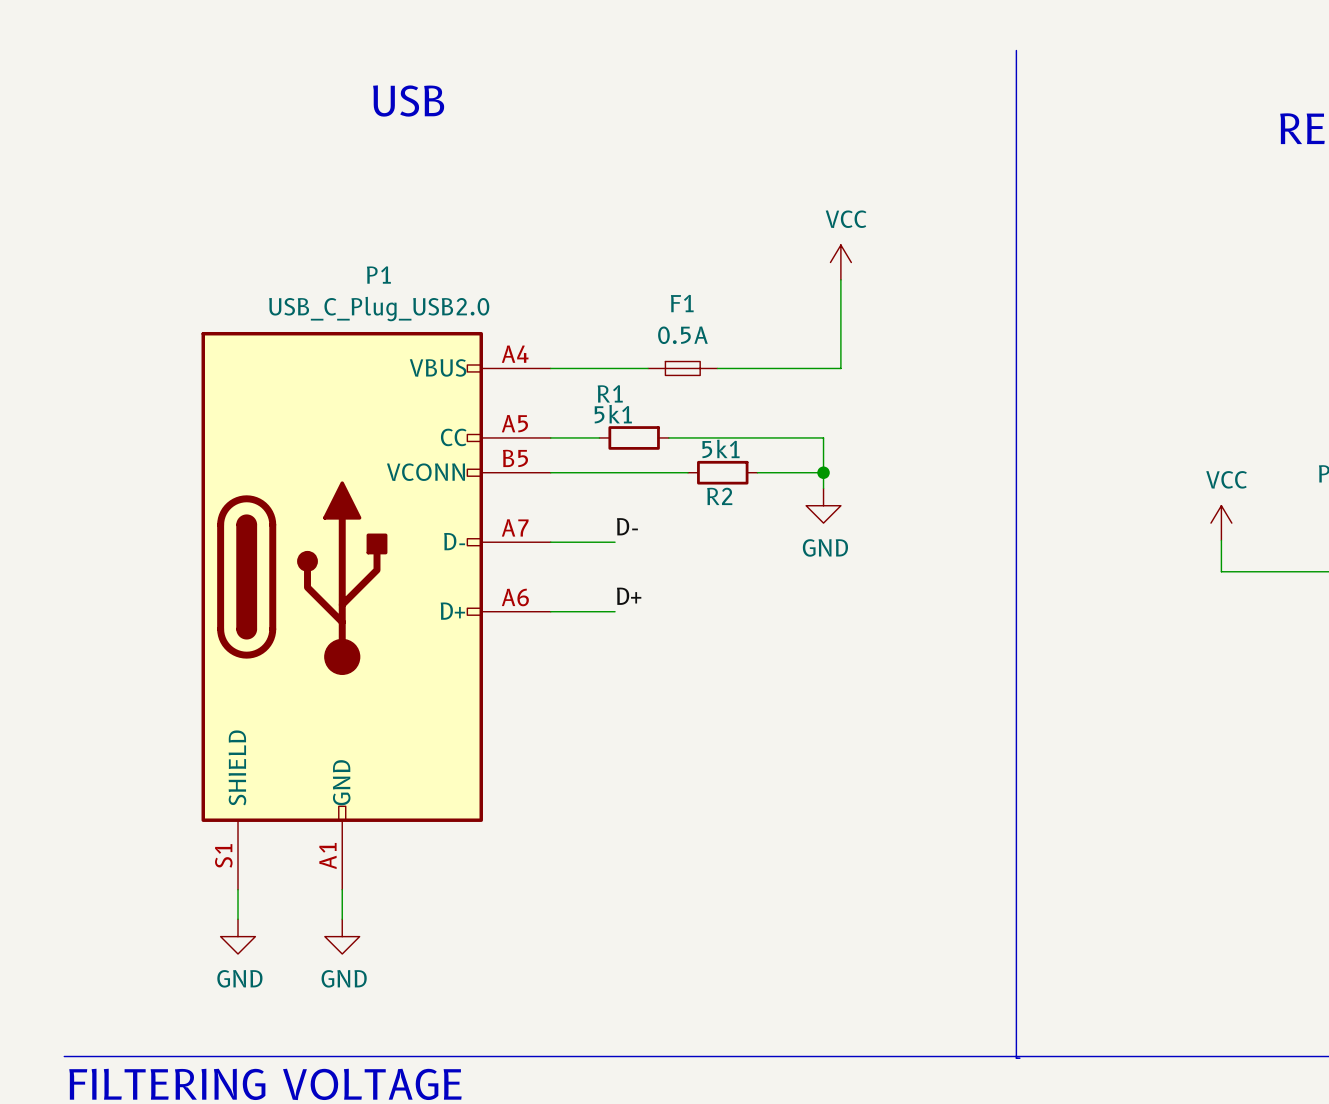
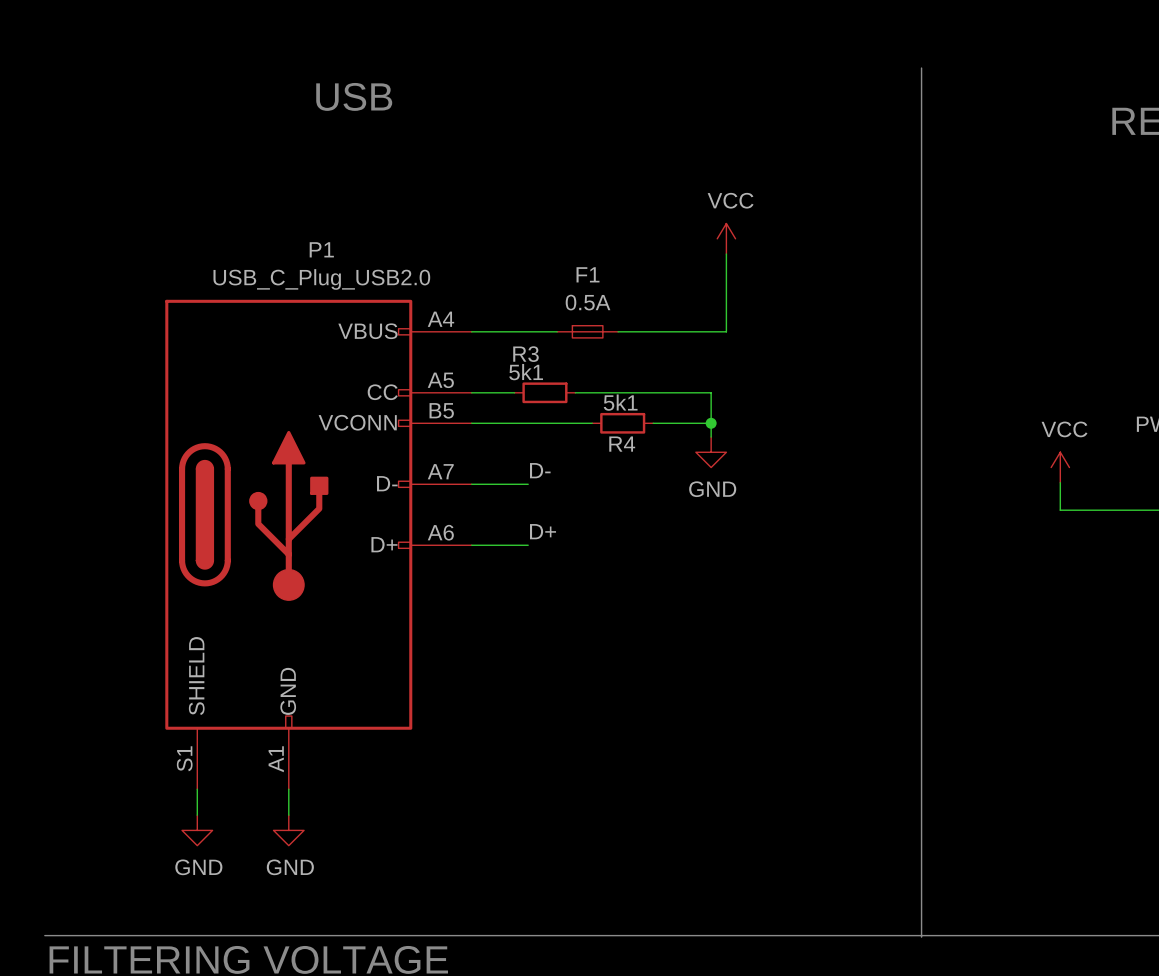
line: (1016, 50) (1016, 1058) (1019, 1058) -> none
line: none -> (921, 68) (921, 937)
R1 name: R1 (610, 393) -> R3 (525, 354)
R2 name: R2 (719, 496) -> R4 (622, 444)

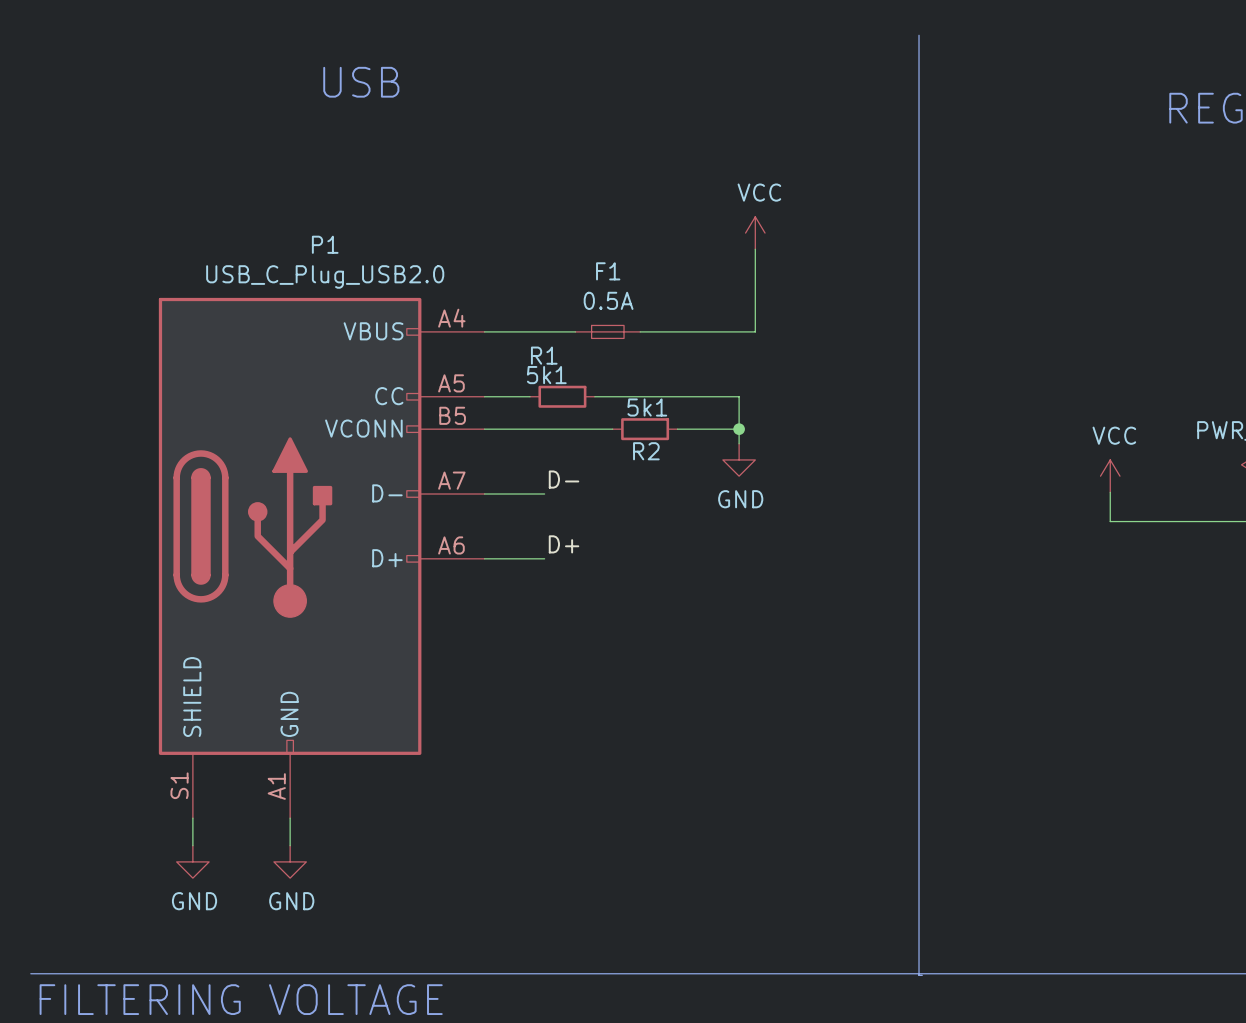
line: none -> (919, 35) (919, 975) (922, 975)
line: (921, 68) (921, 937) -> none
R3 name: R3 (525, 354) -> R1 (544, 355)
R4 name: R4 (622, 444) -> R2 (646, 451)

